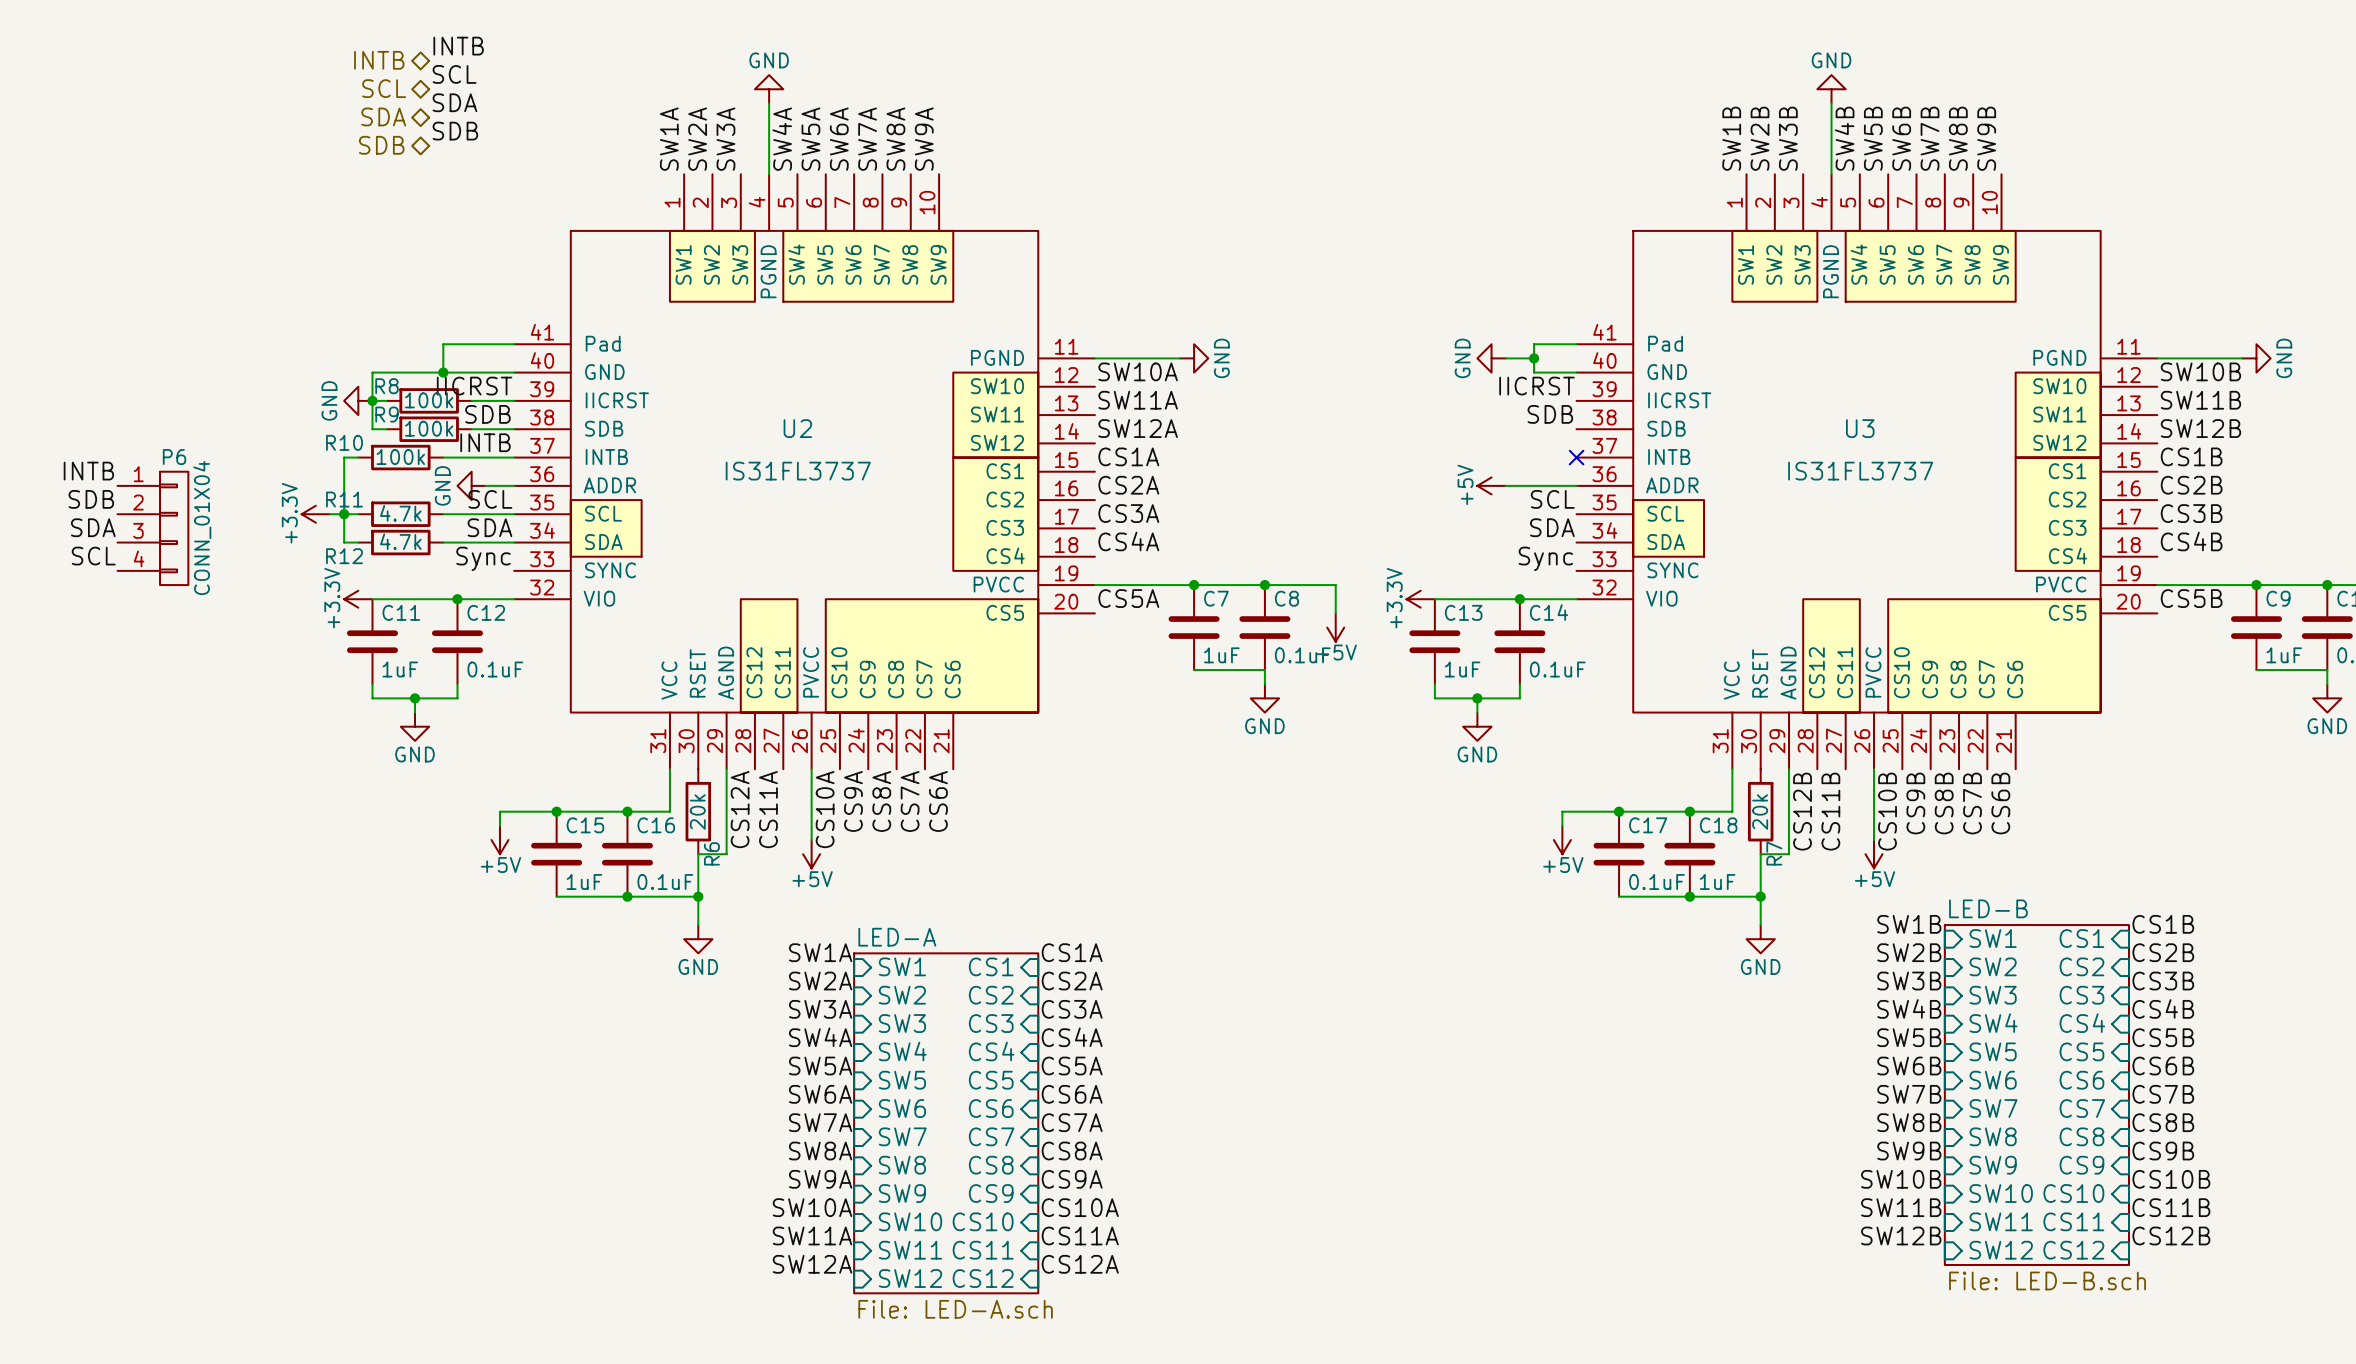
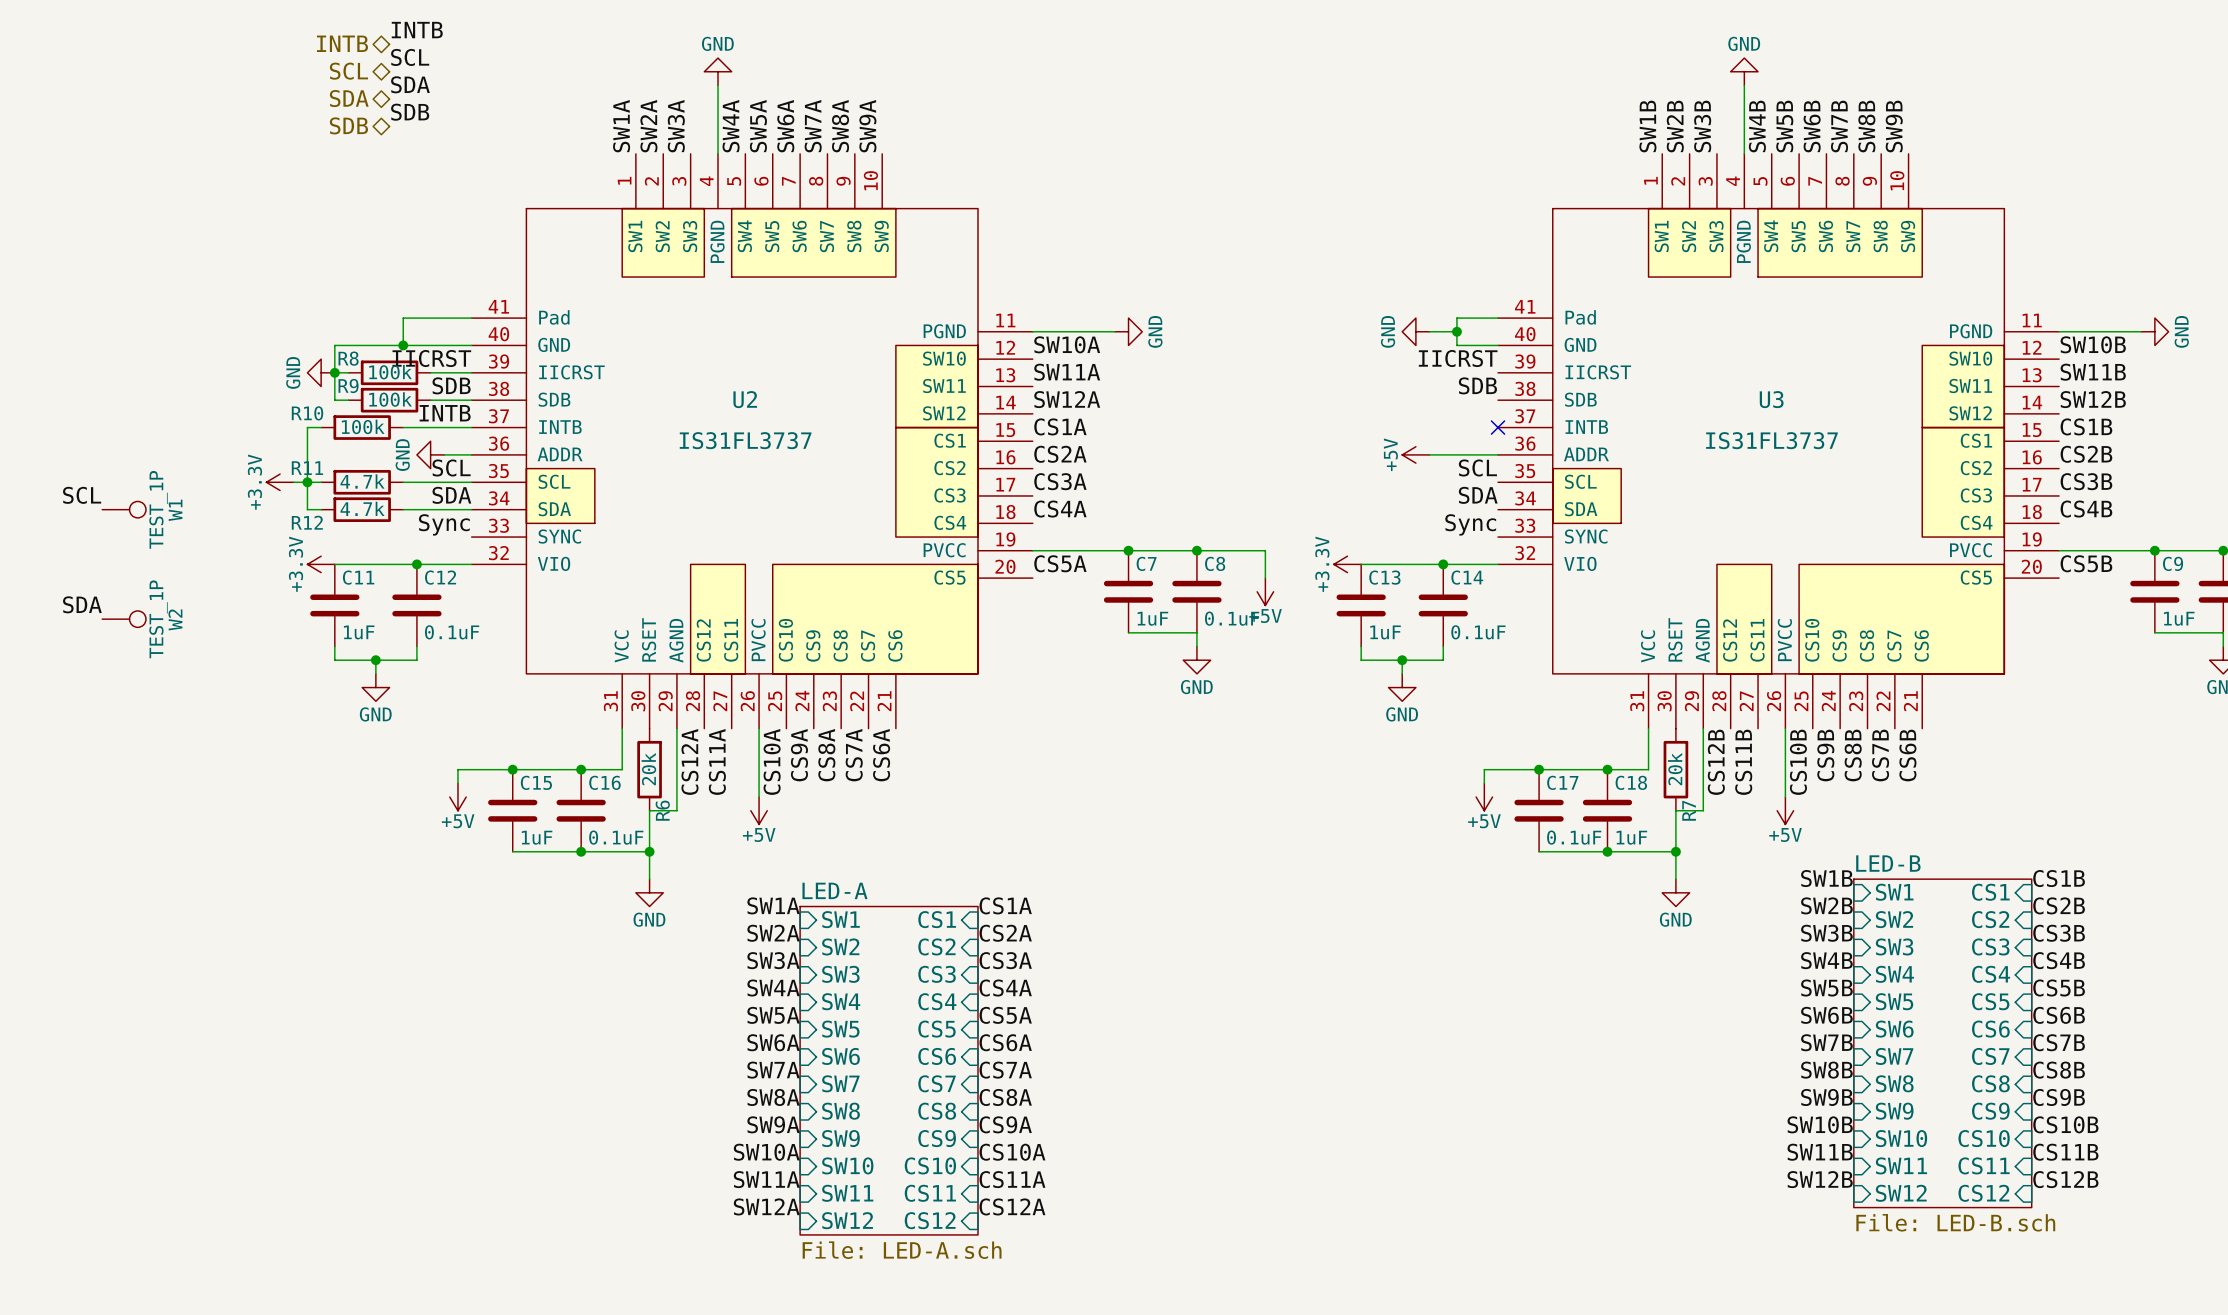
label: INTB (88, 471) -> none
label: SDB (91, 499) -> none
label position: SDA (93, 527) -> SDA (82, 604)
P6: CONN_01X04 (152, 528) -> none
W1: none -> TEST_1P (124, 509)
label position: SCL (93, 556) -> SCL (82, 495)
W2: none -> TEST_1P (124, 619)

